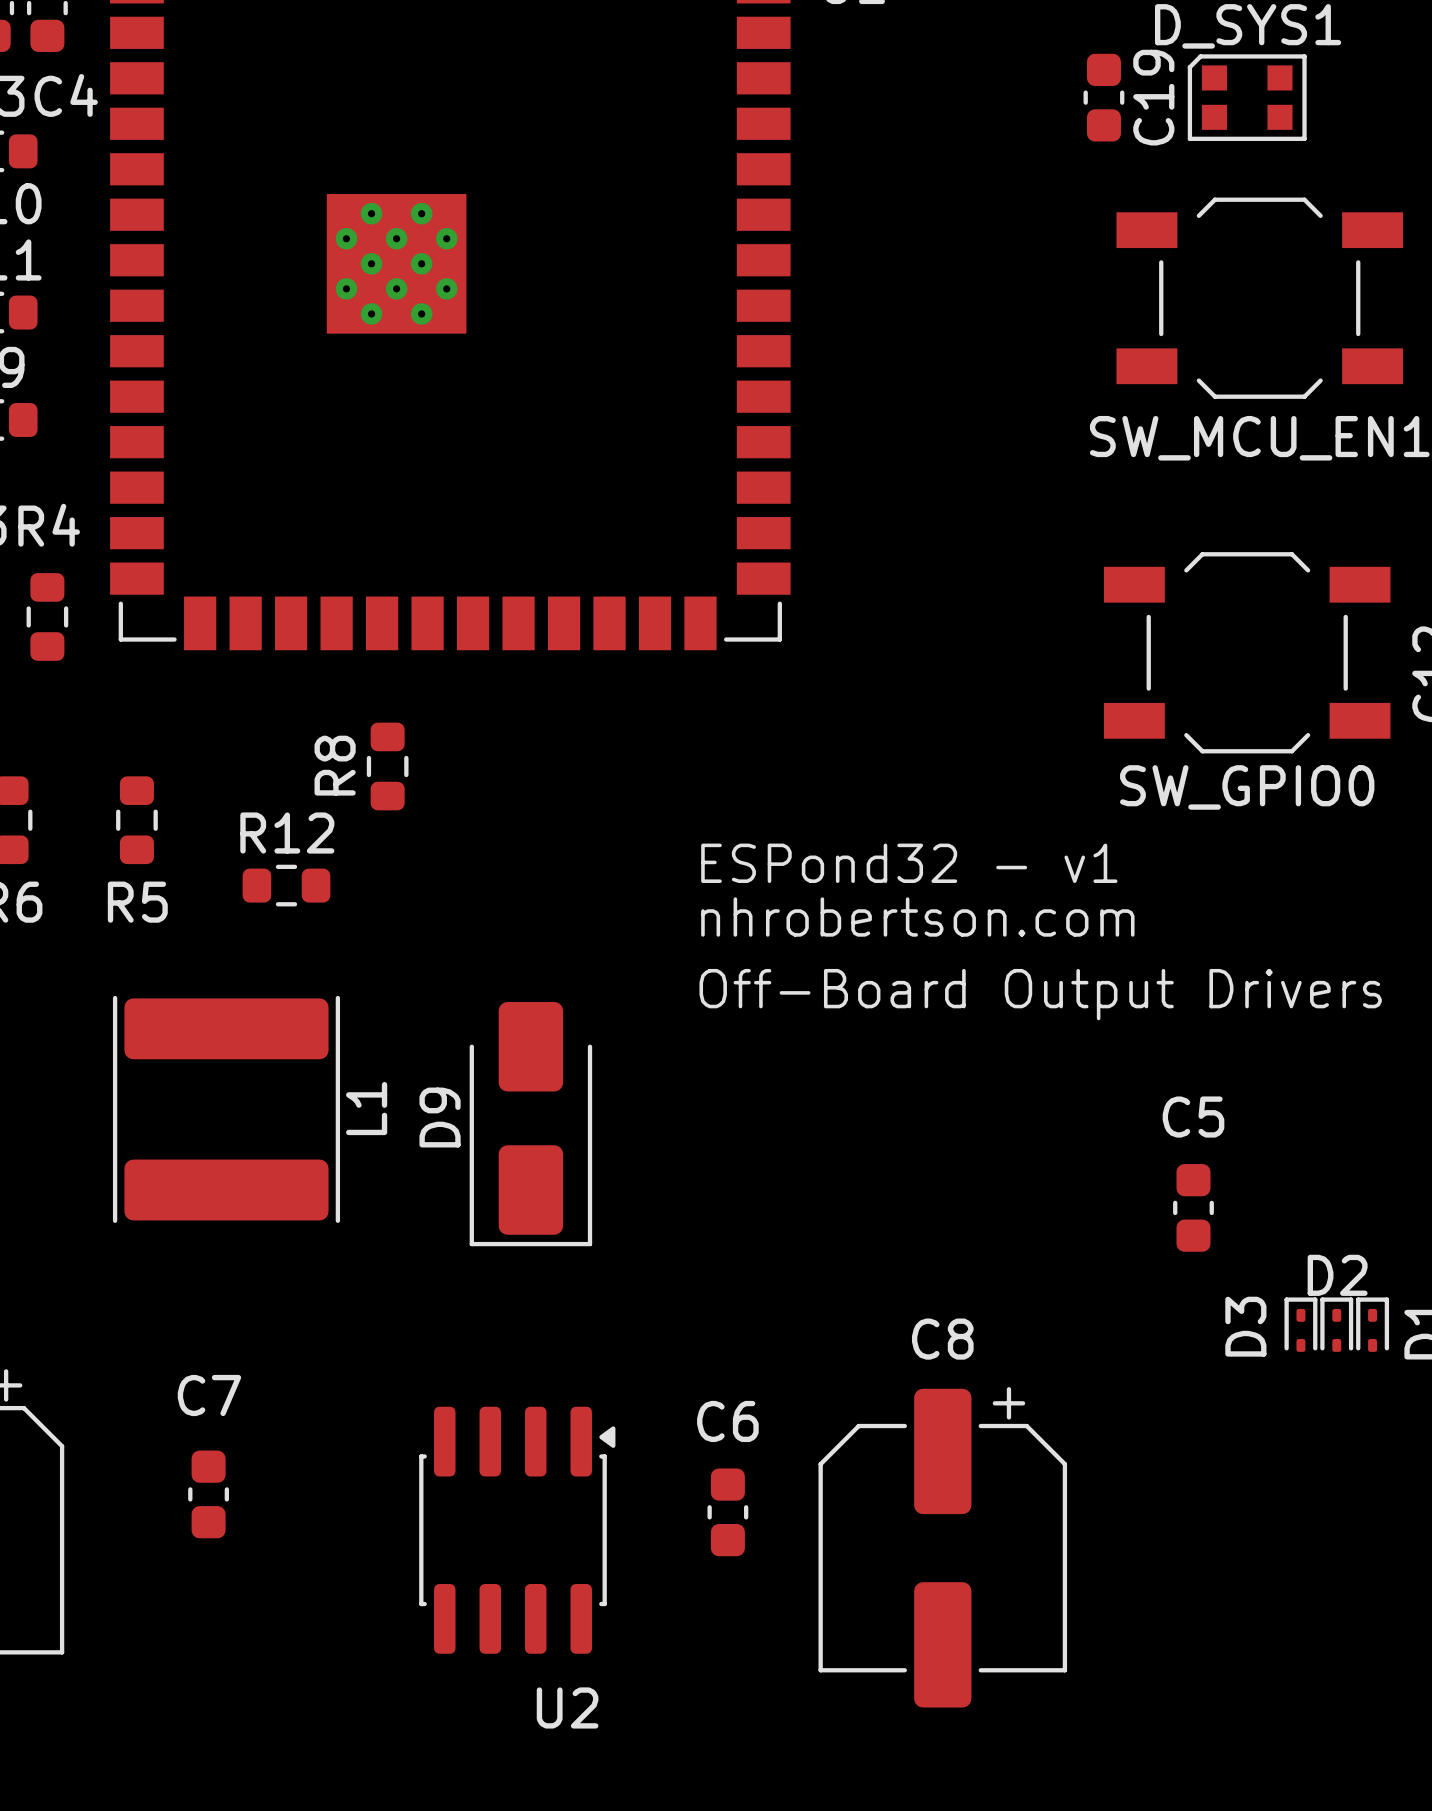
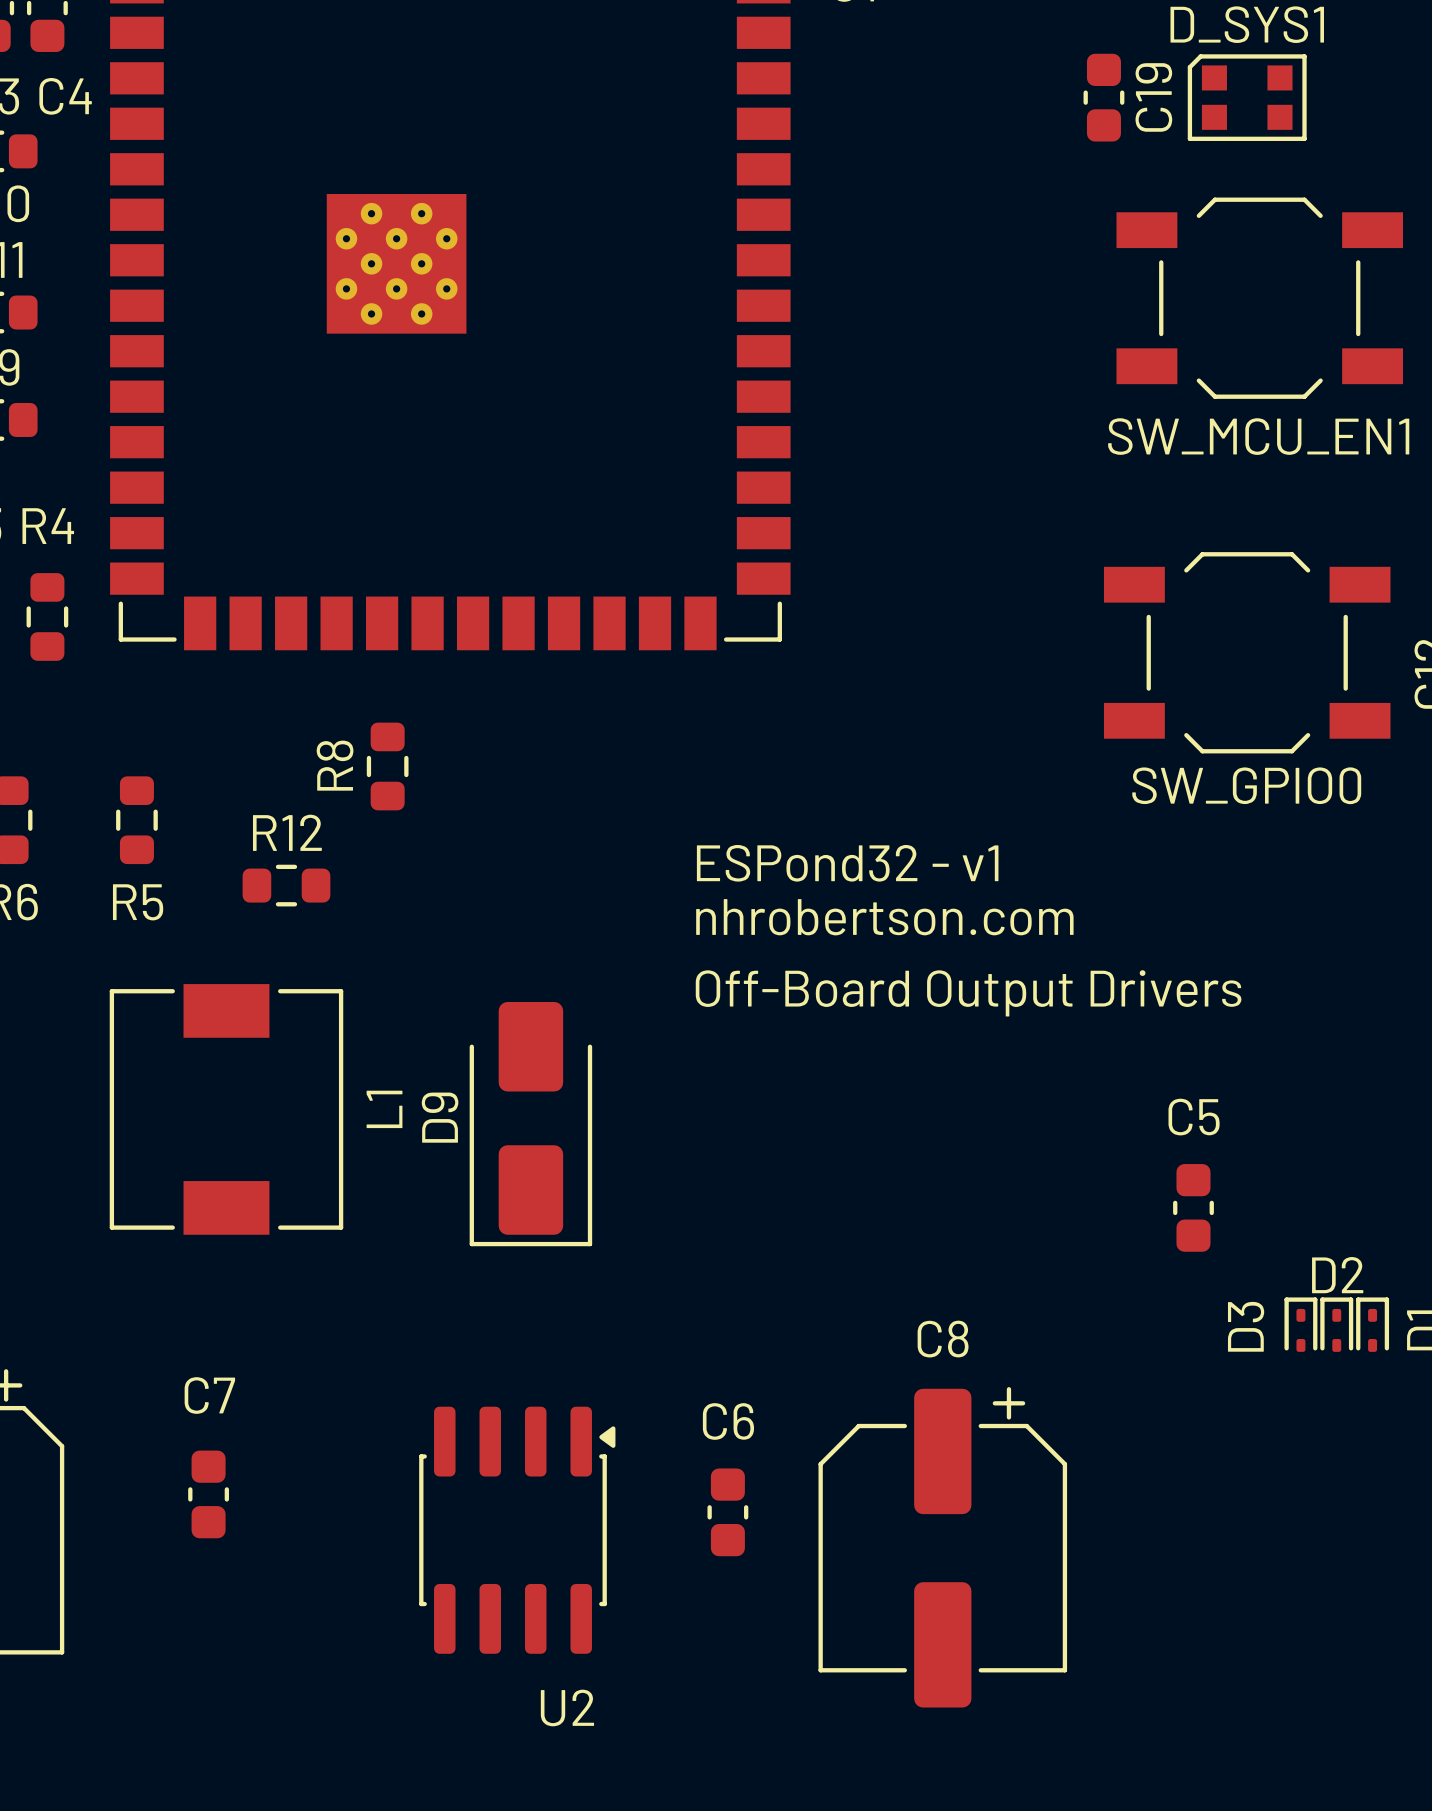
L1 footprint: [112, 995, 341, 1223] -> [109, 984, 344, 1235]

